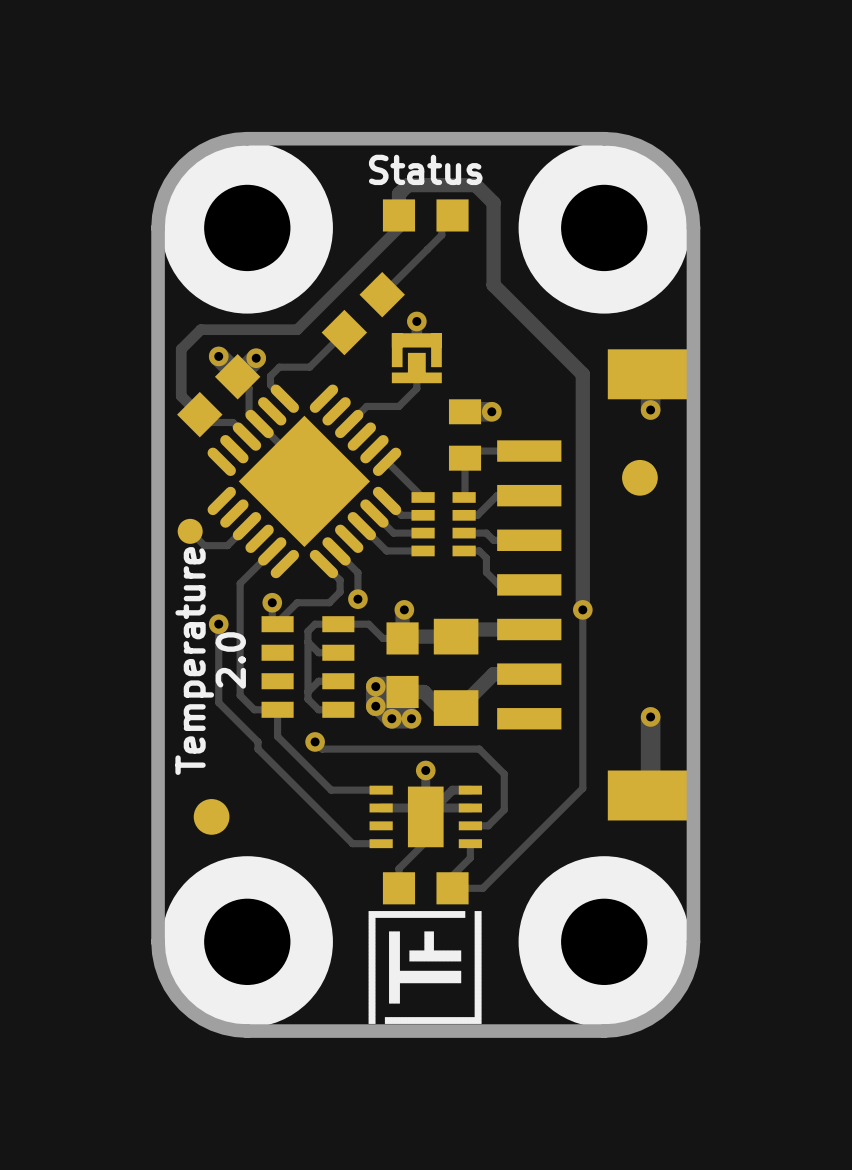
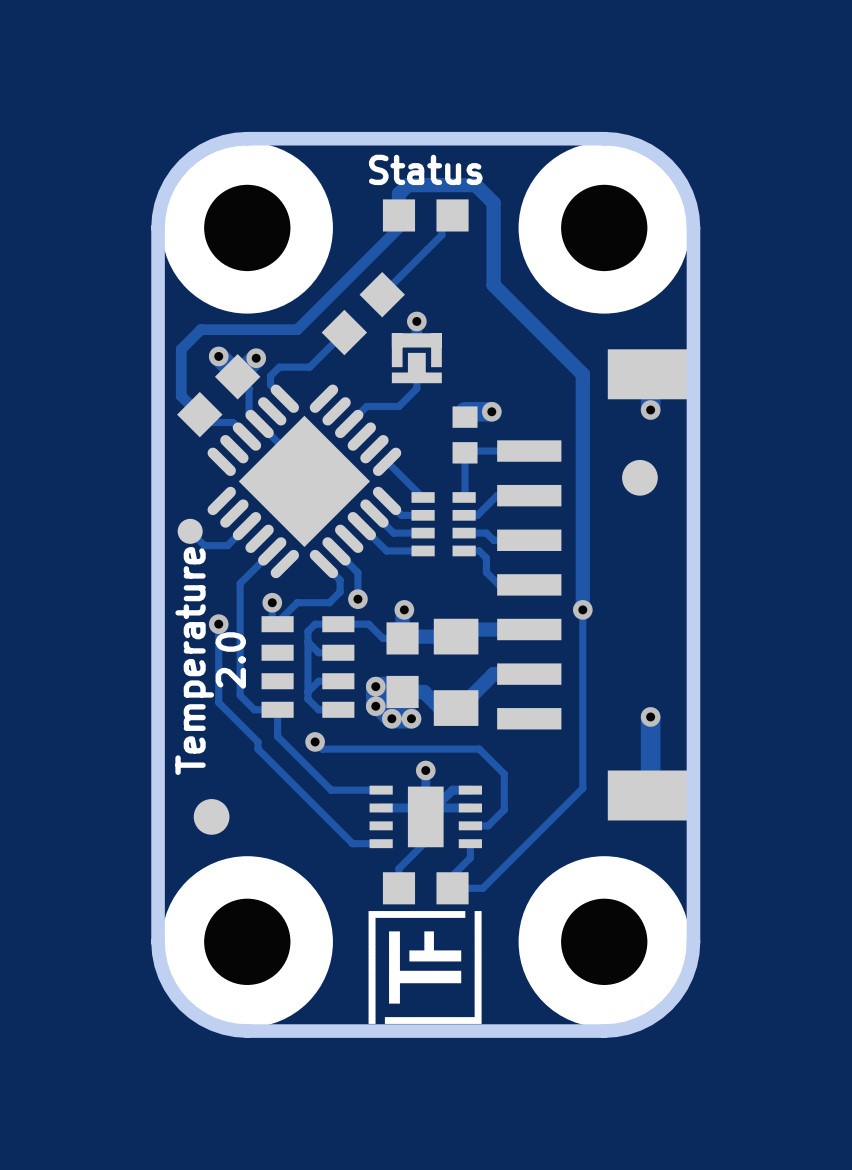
part footprint: [448, 399, 482, 471] -> [452, 406, 478, 464]

